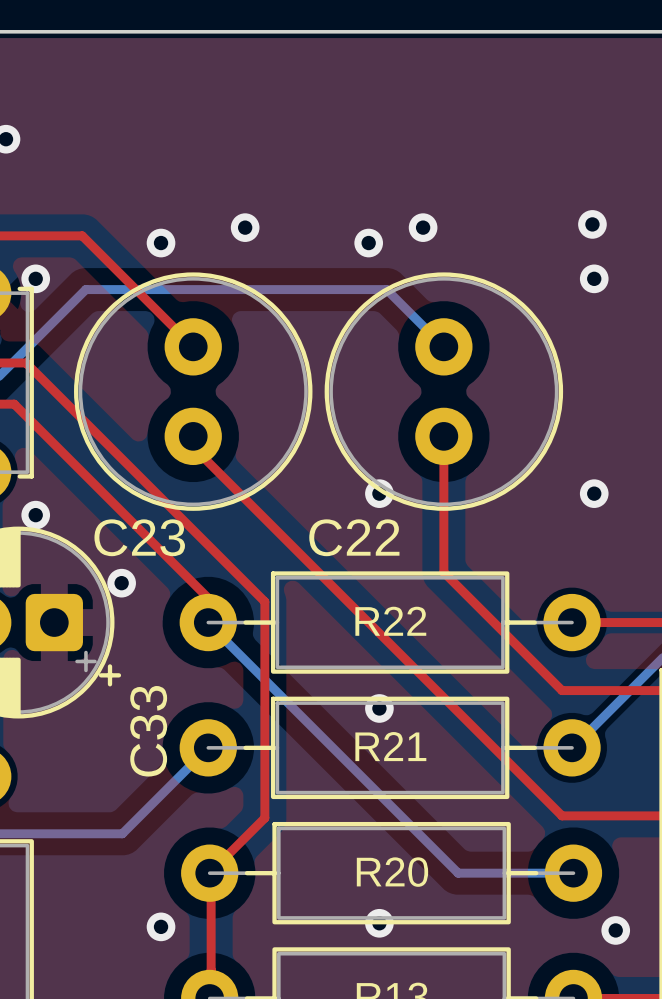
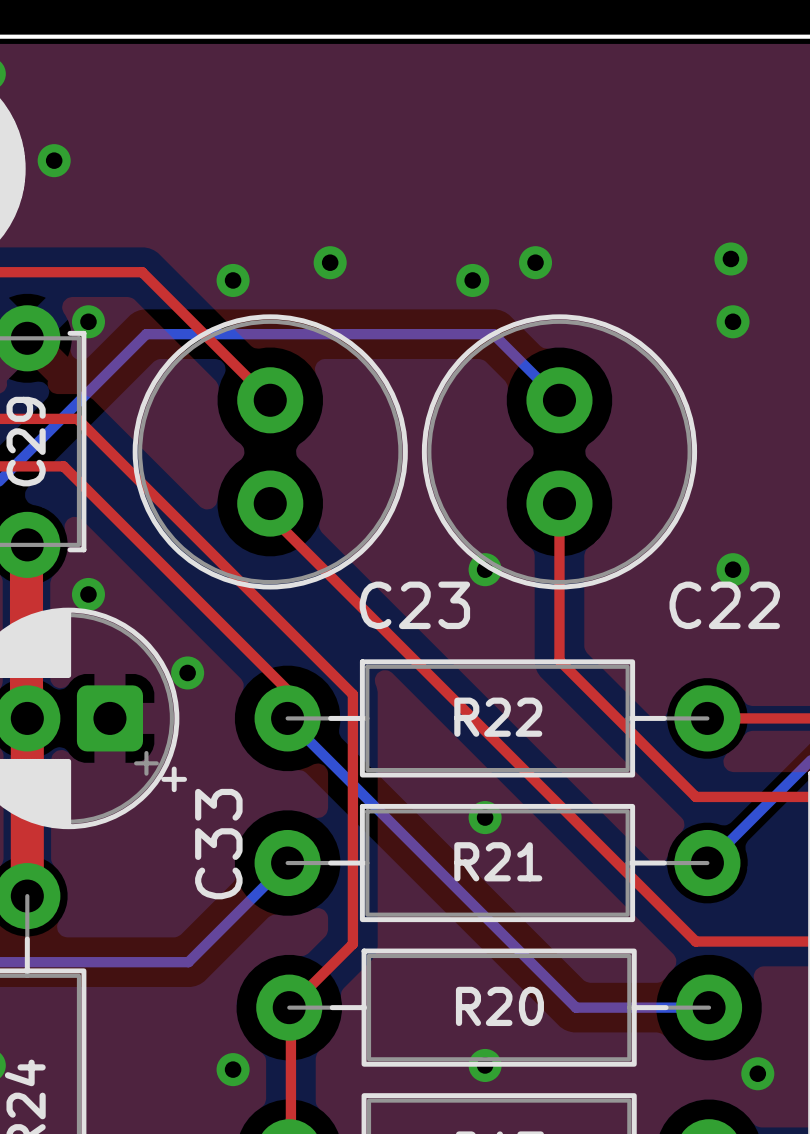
C23 name position: C23 (139, 537) -> C23 (414, 605)
C22 name position: C22 (354, 537) -> C22 (724, 605)

